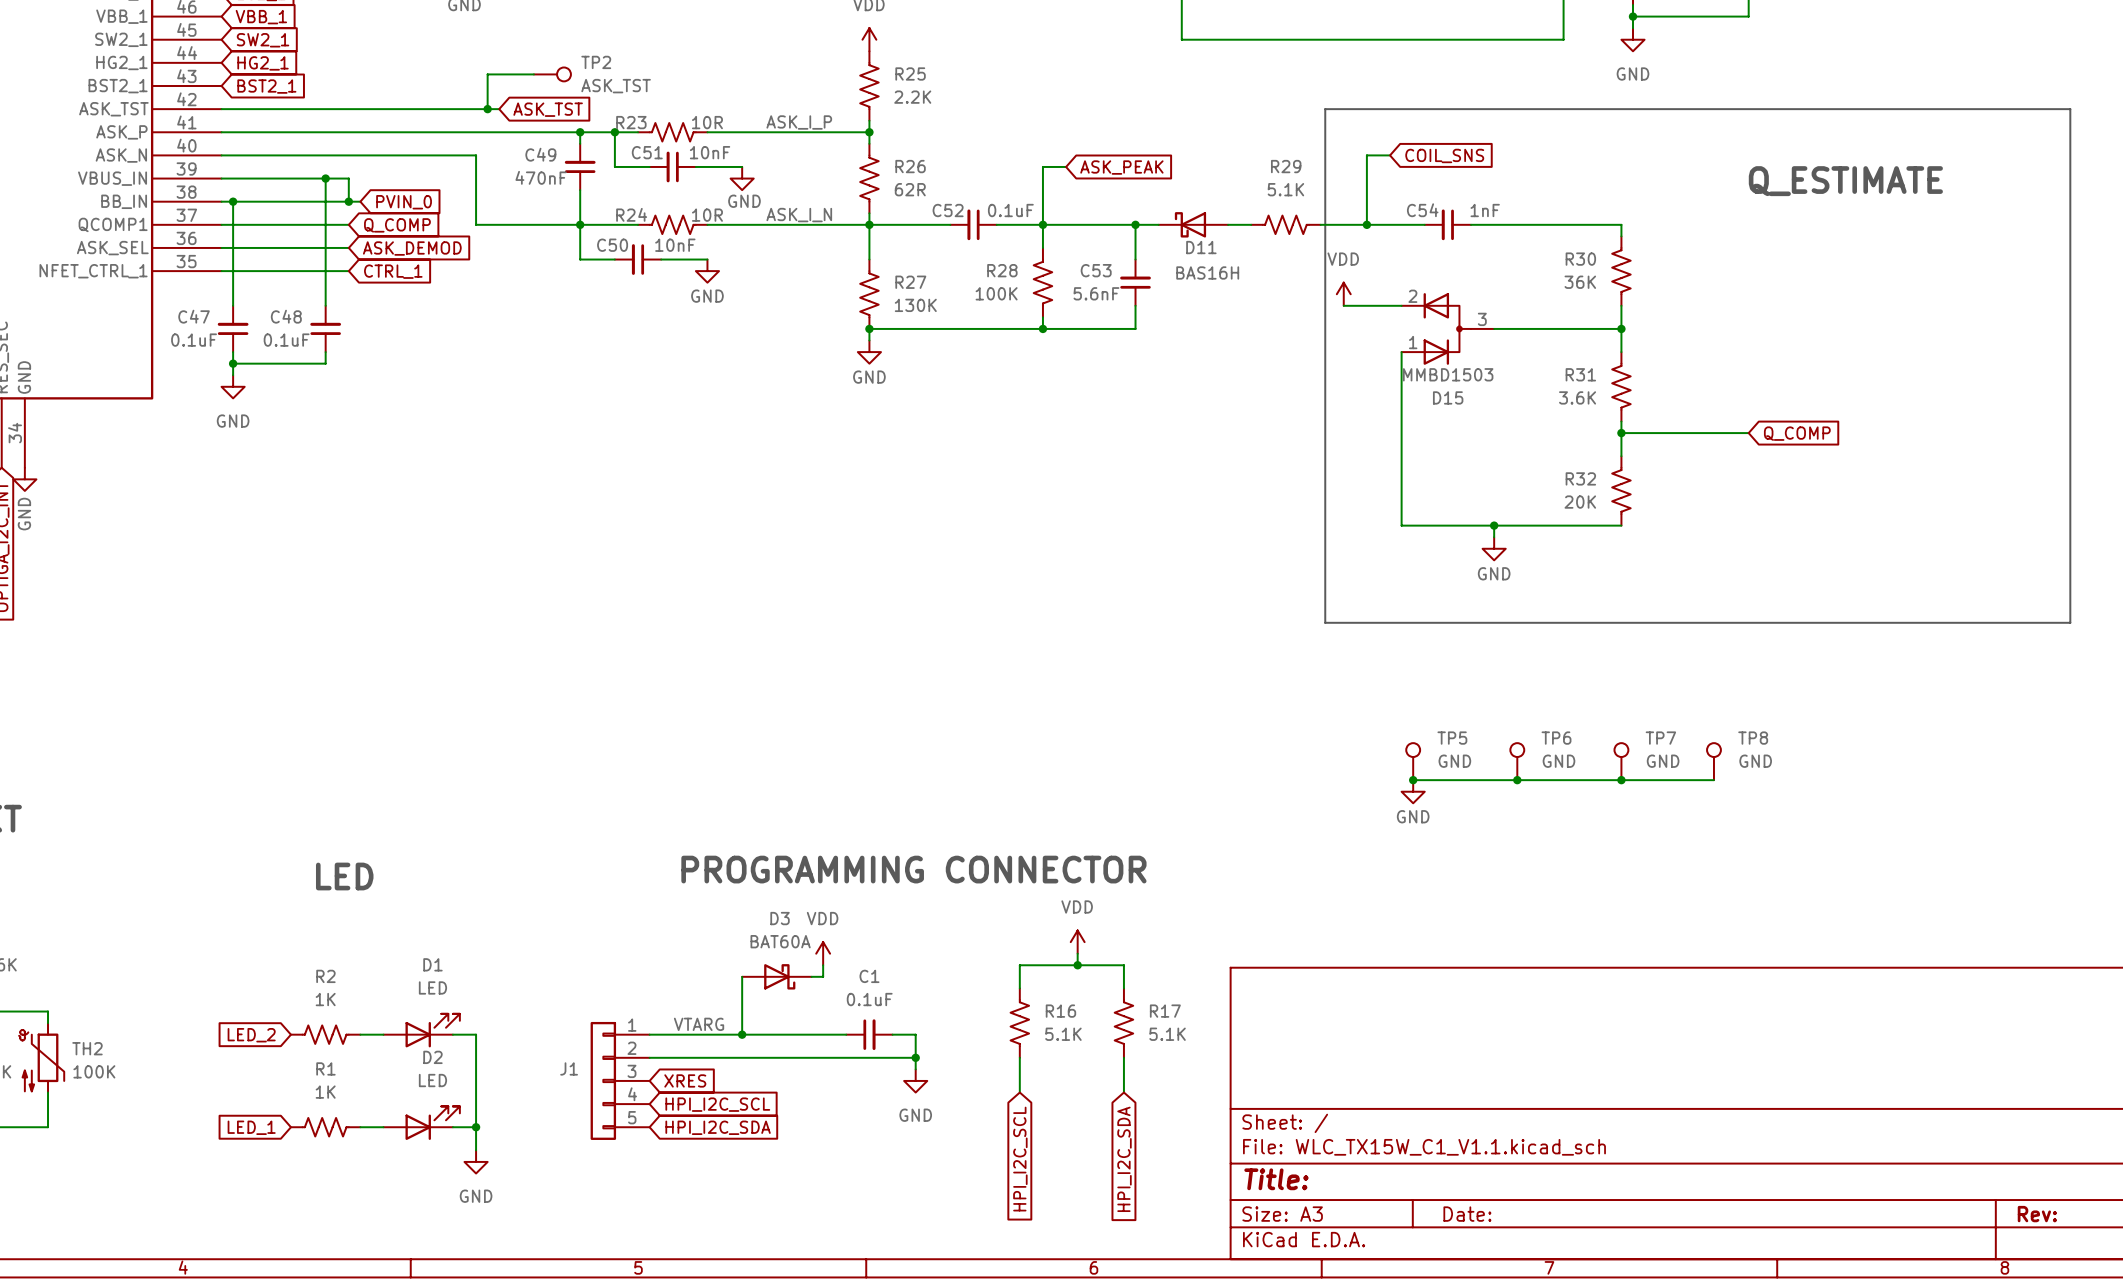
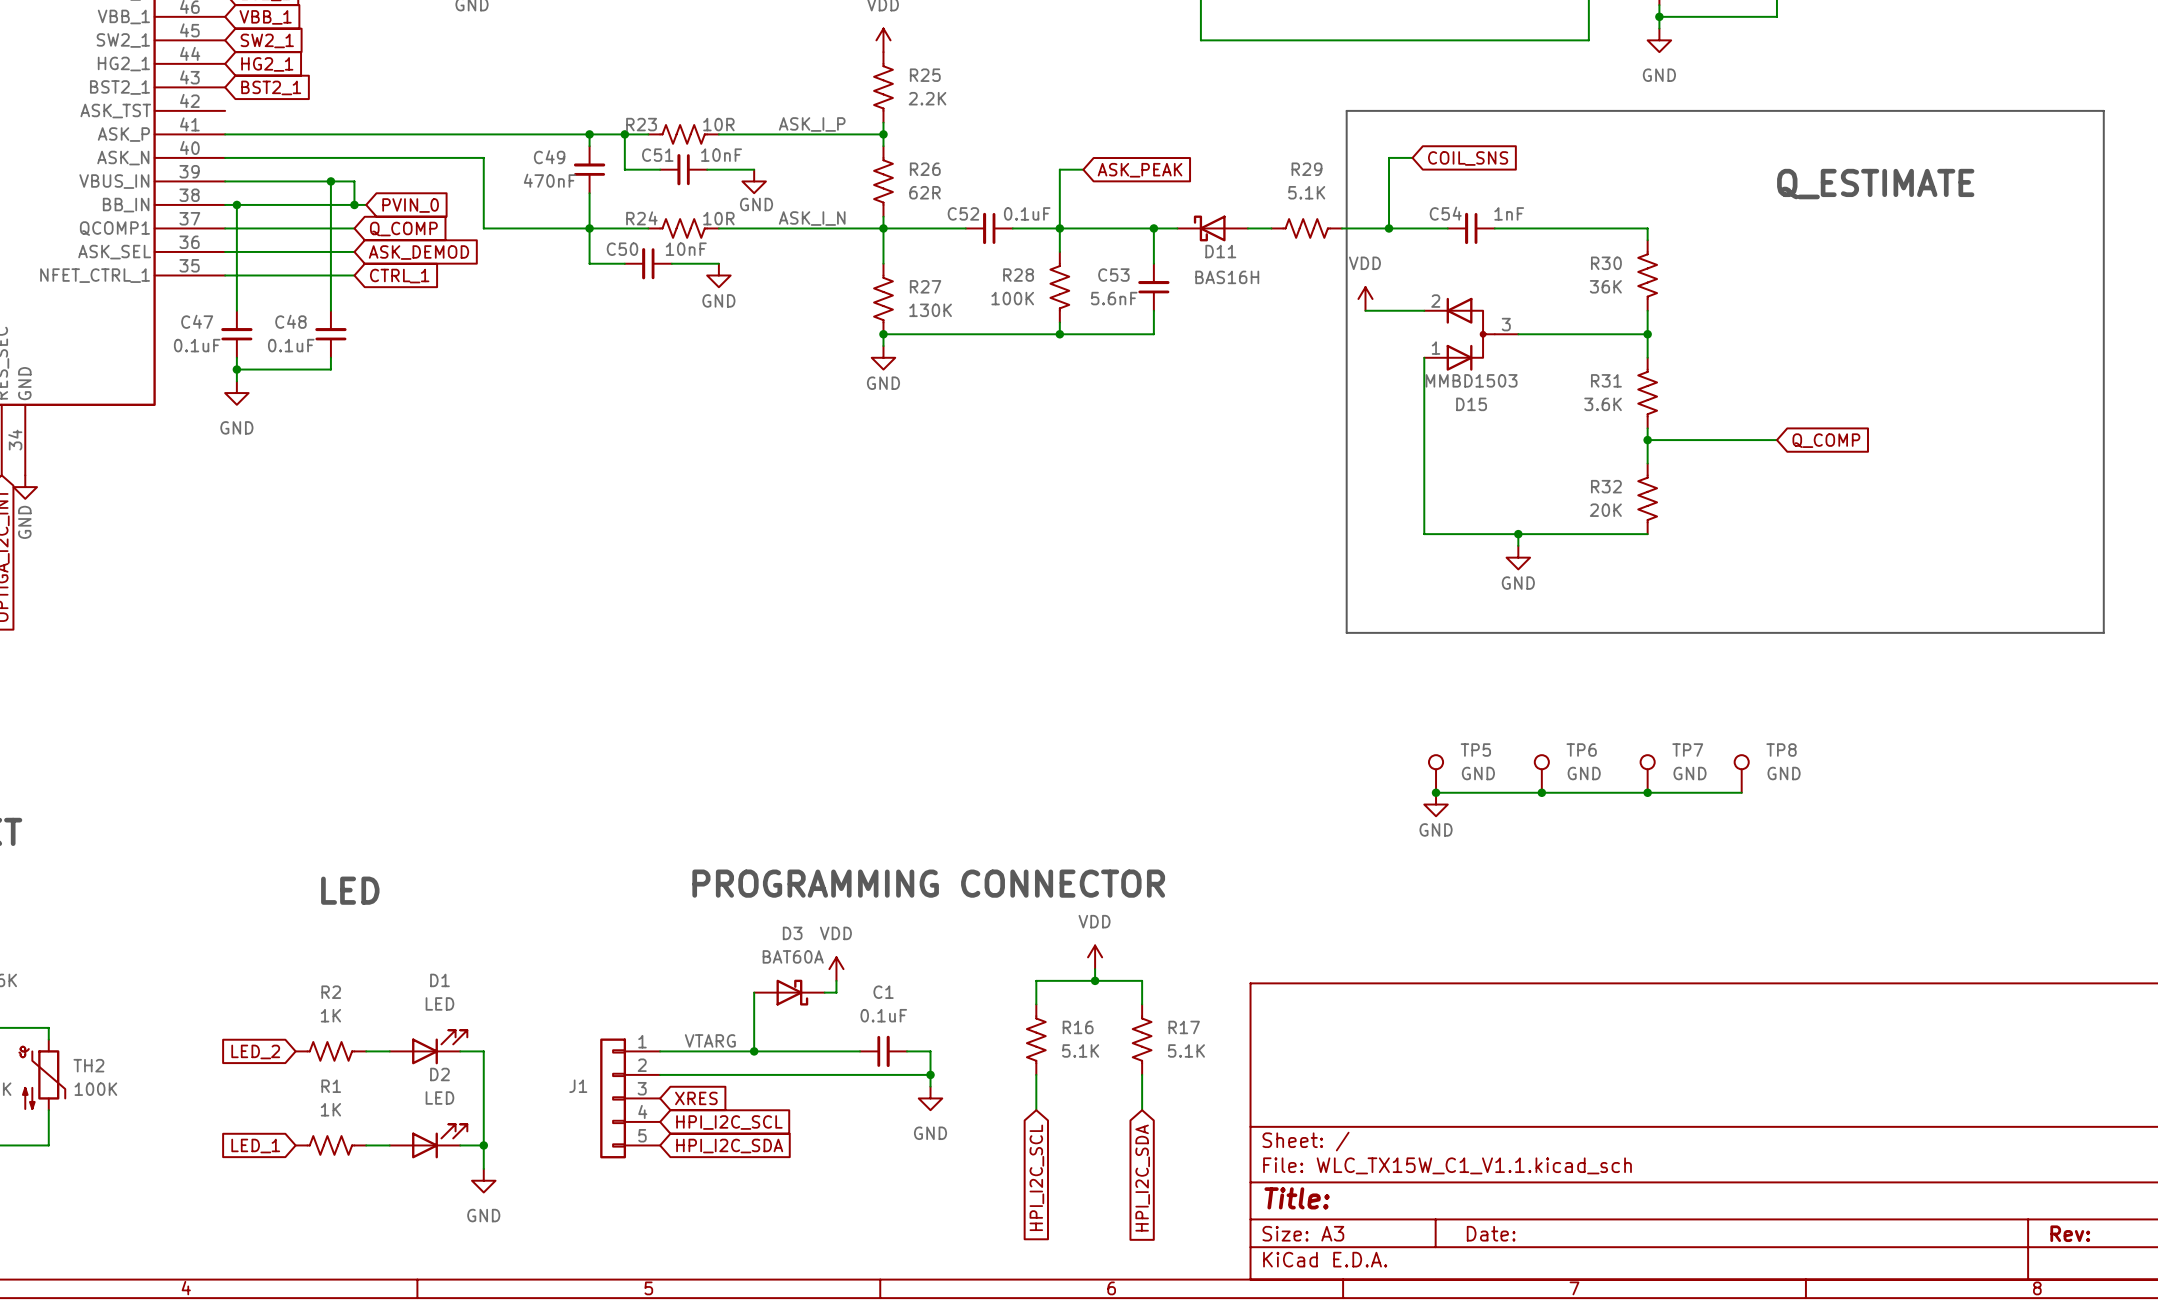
wire: (533, 74) (487, 74) (487, 109) -> none
TP2: ASK_TST (552, 74) -> none
wire: (221, 109) (499, 109) -> none
junction: (487, 109) -> none
global label: ASK_TST (548, 109) -> none

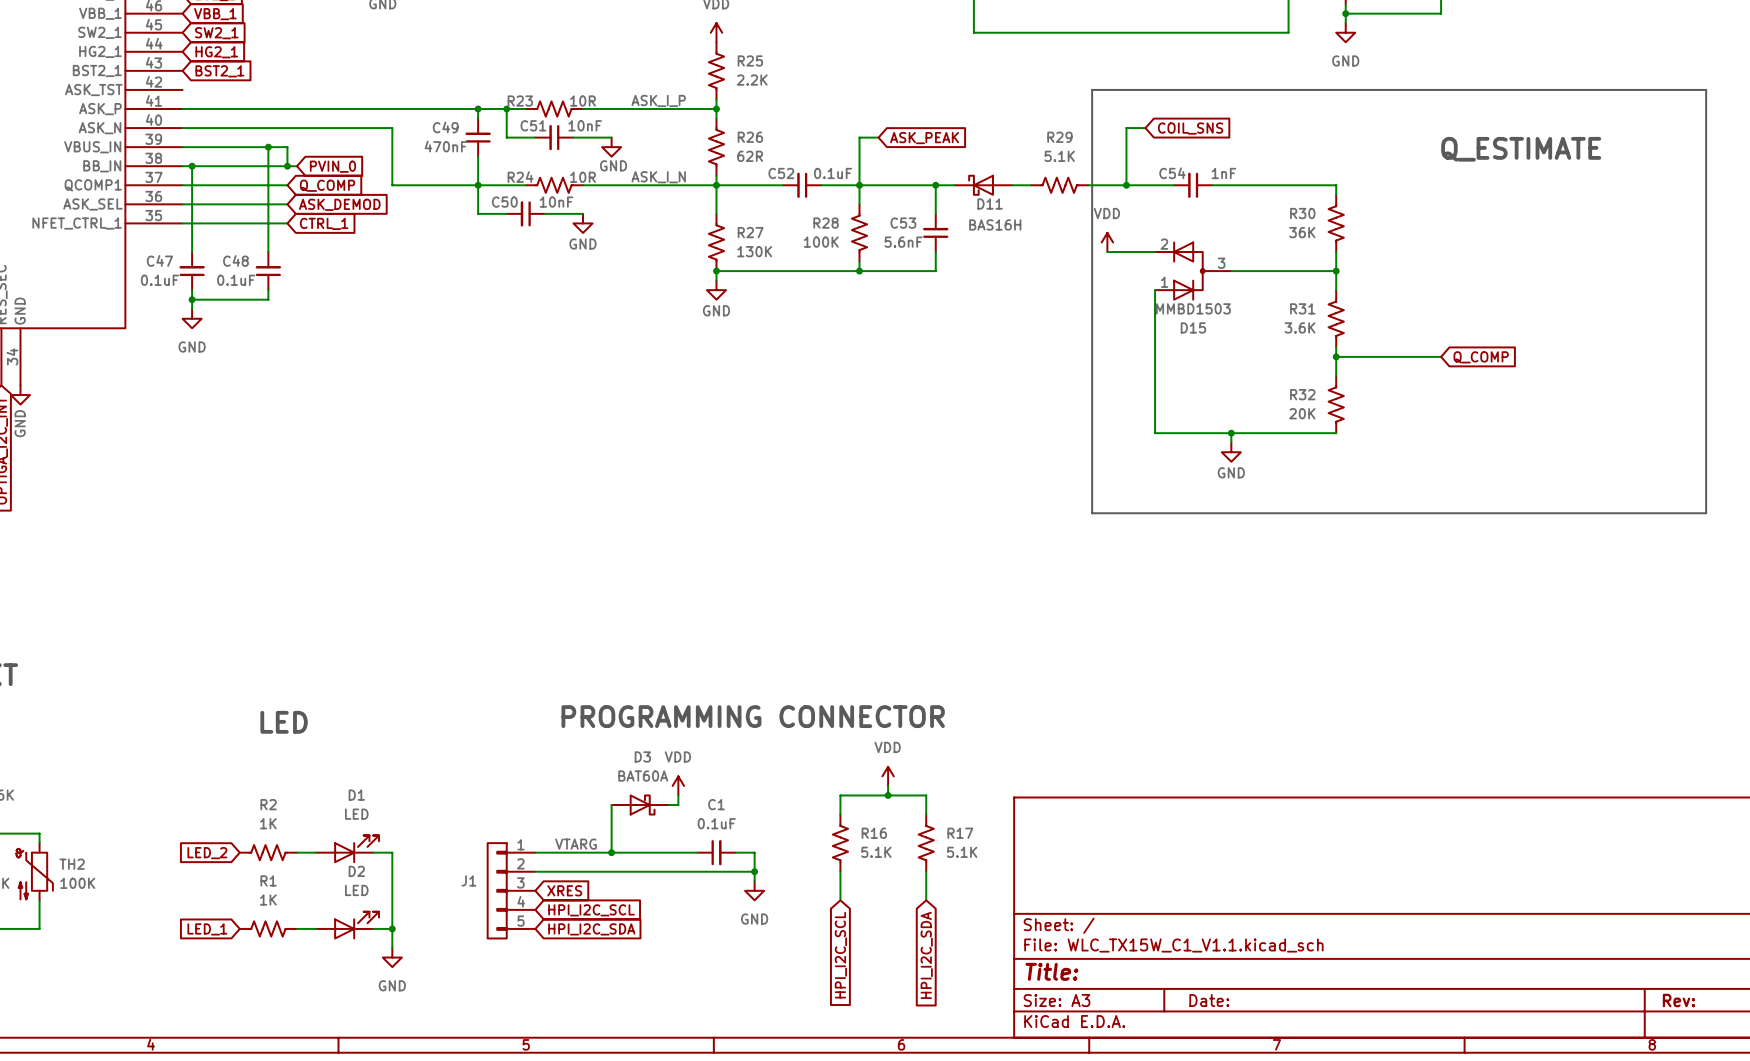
TP5: GND (1436, 773) -> none
TP6: GND (1541, 773) -> none
TP7: GND (1647, 773) -> none
TP8: GND (1741, 773) -> none
wire: (1436, 792) (1741, 792) -> none
junction: (1436, 792) -> none
junction: (1541, 792) -> none
junction: (1647, 792) -> none
power symbol: GND (1436, 804) -> none

